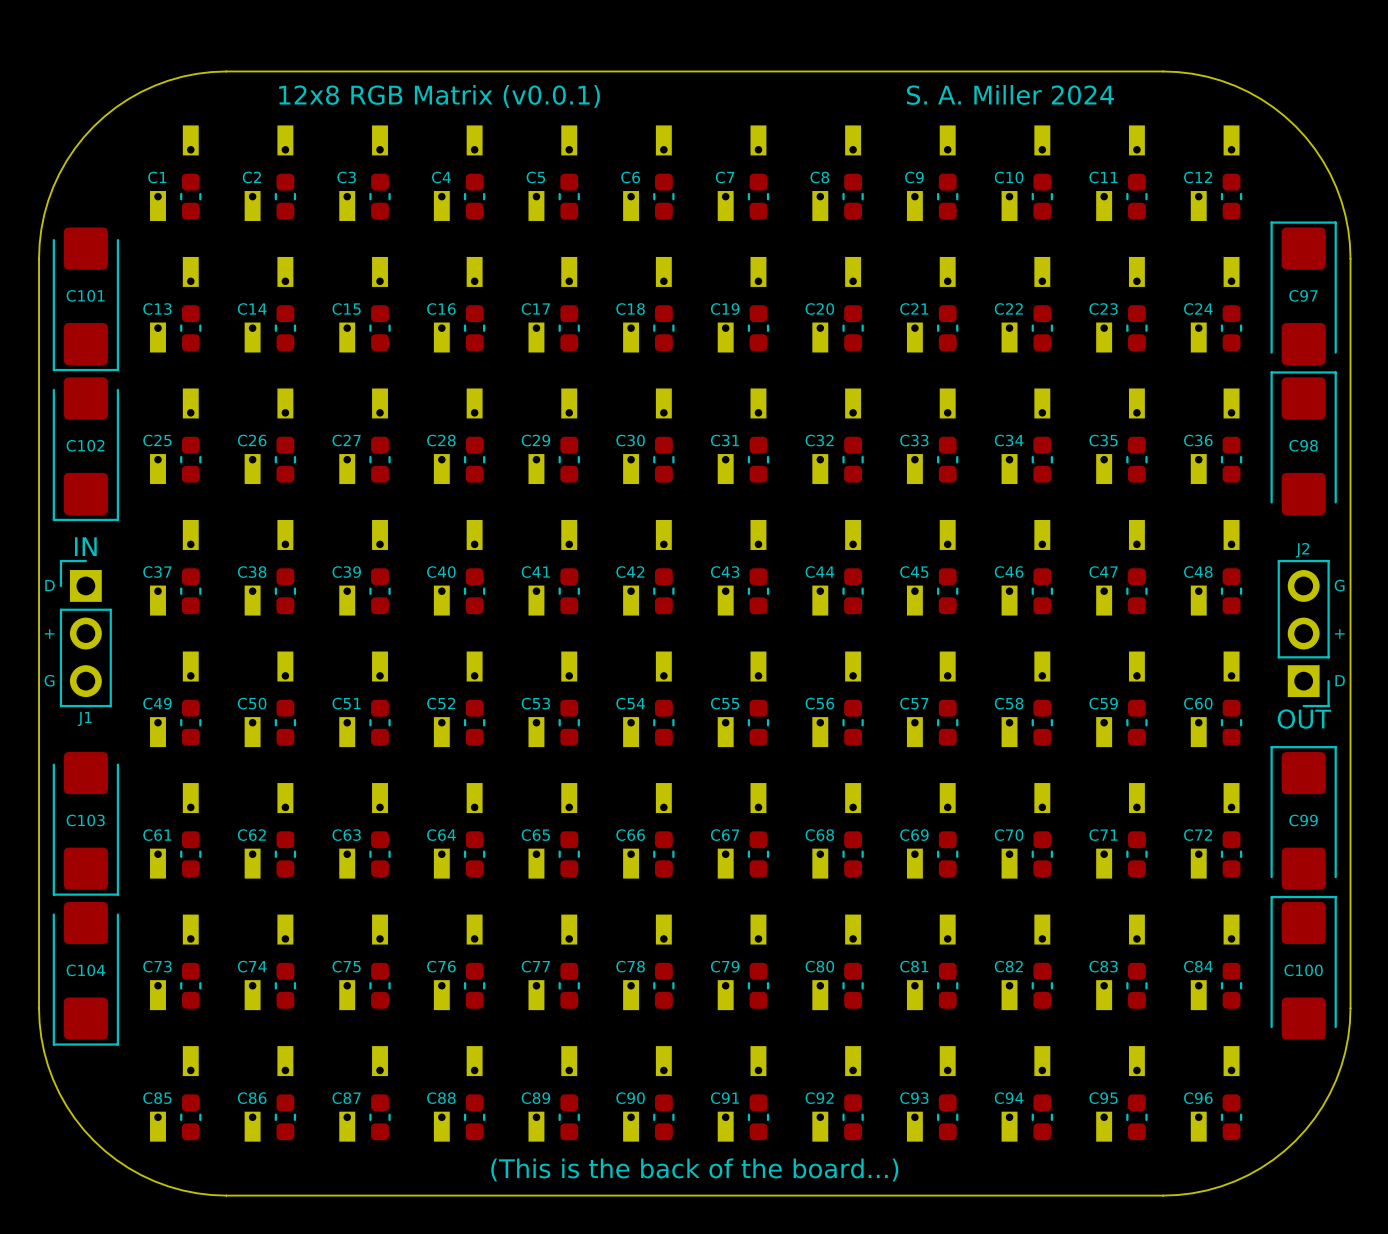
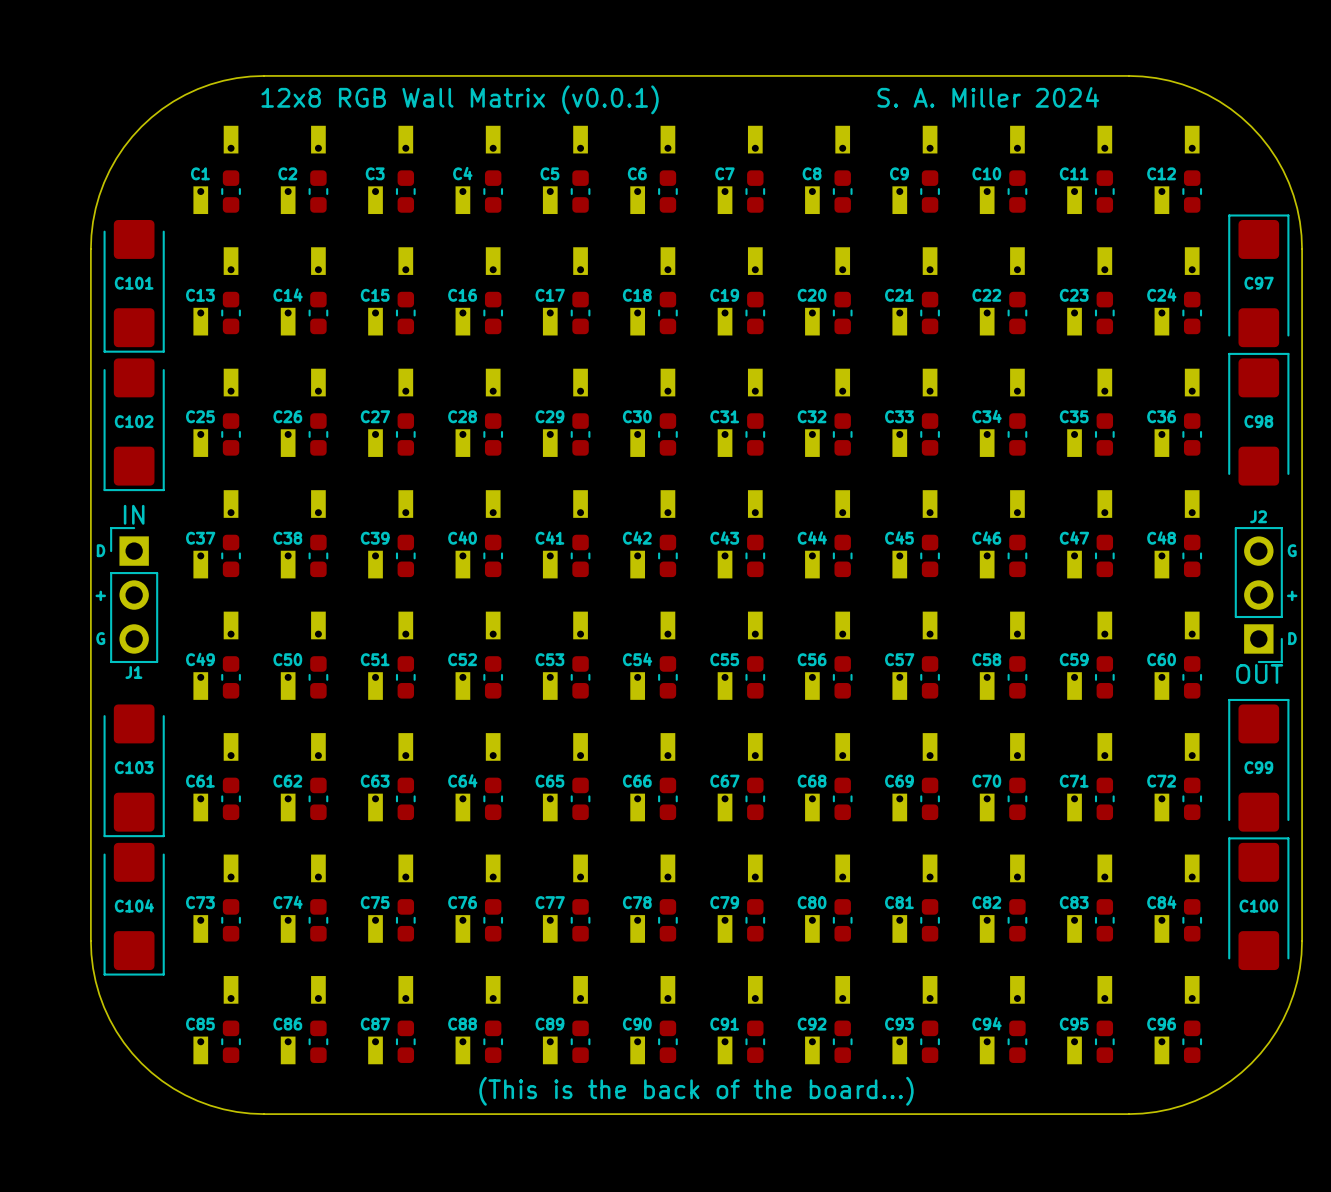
text: 12x8 RGB Matrix (v0.0.1) (439, 96) -> 12x8 RGB Wall Matrix (v0.0.1) (460, 99)

